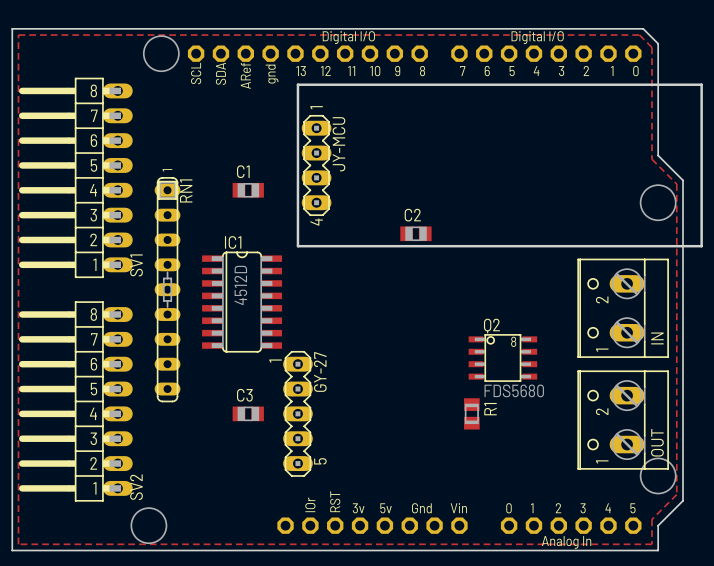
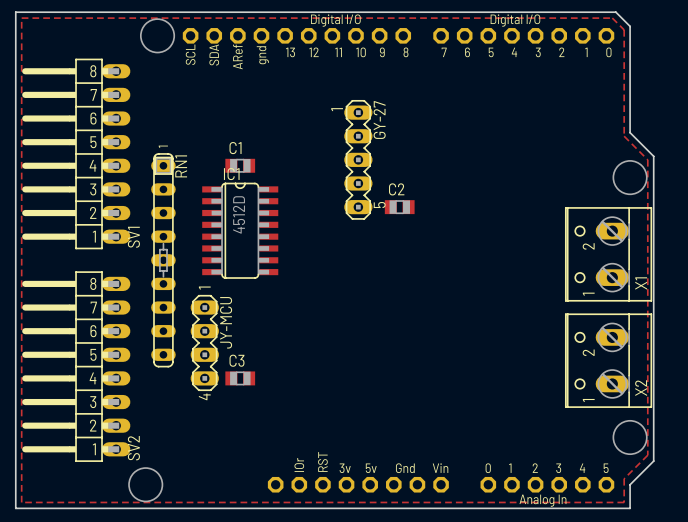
board edge: (297, 84) (297, 246) (701, 246) (701, 84) (297, 84) -> none
JY-MCU position: (316, 165) -> (204, 342)
X1: none -> (608, 254)
IC1 position: (242, 302) -> (240, 230)
IN: (623, 308) -> none
Q2: FDS5680 (502, 357) -> none
X2: none -> (608, 360)
GY-27 position: (297, 413) -> (358, 159)
R1: (471, 413) -> none
OUT: (623, 420) -> none

